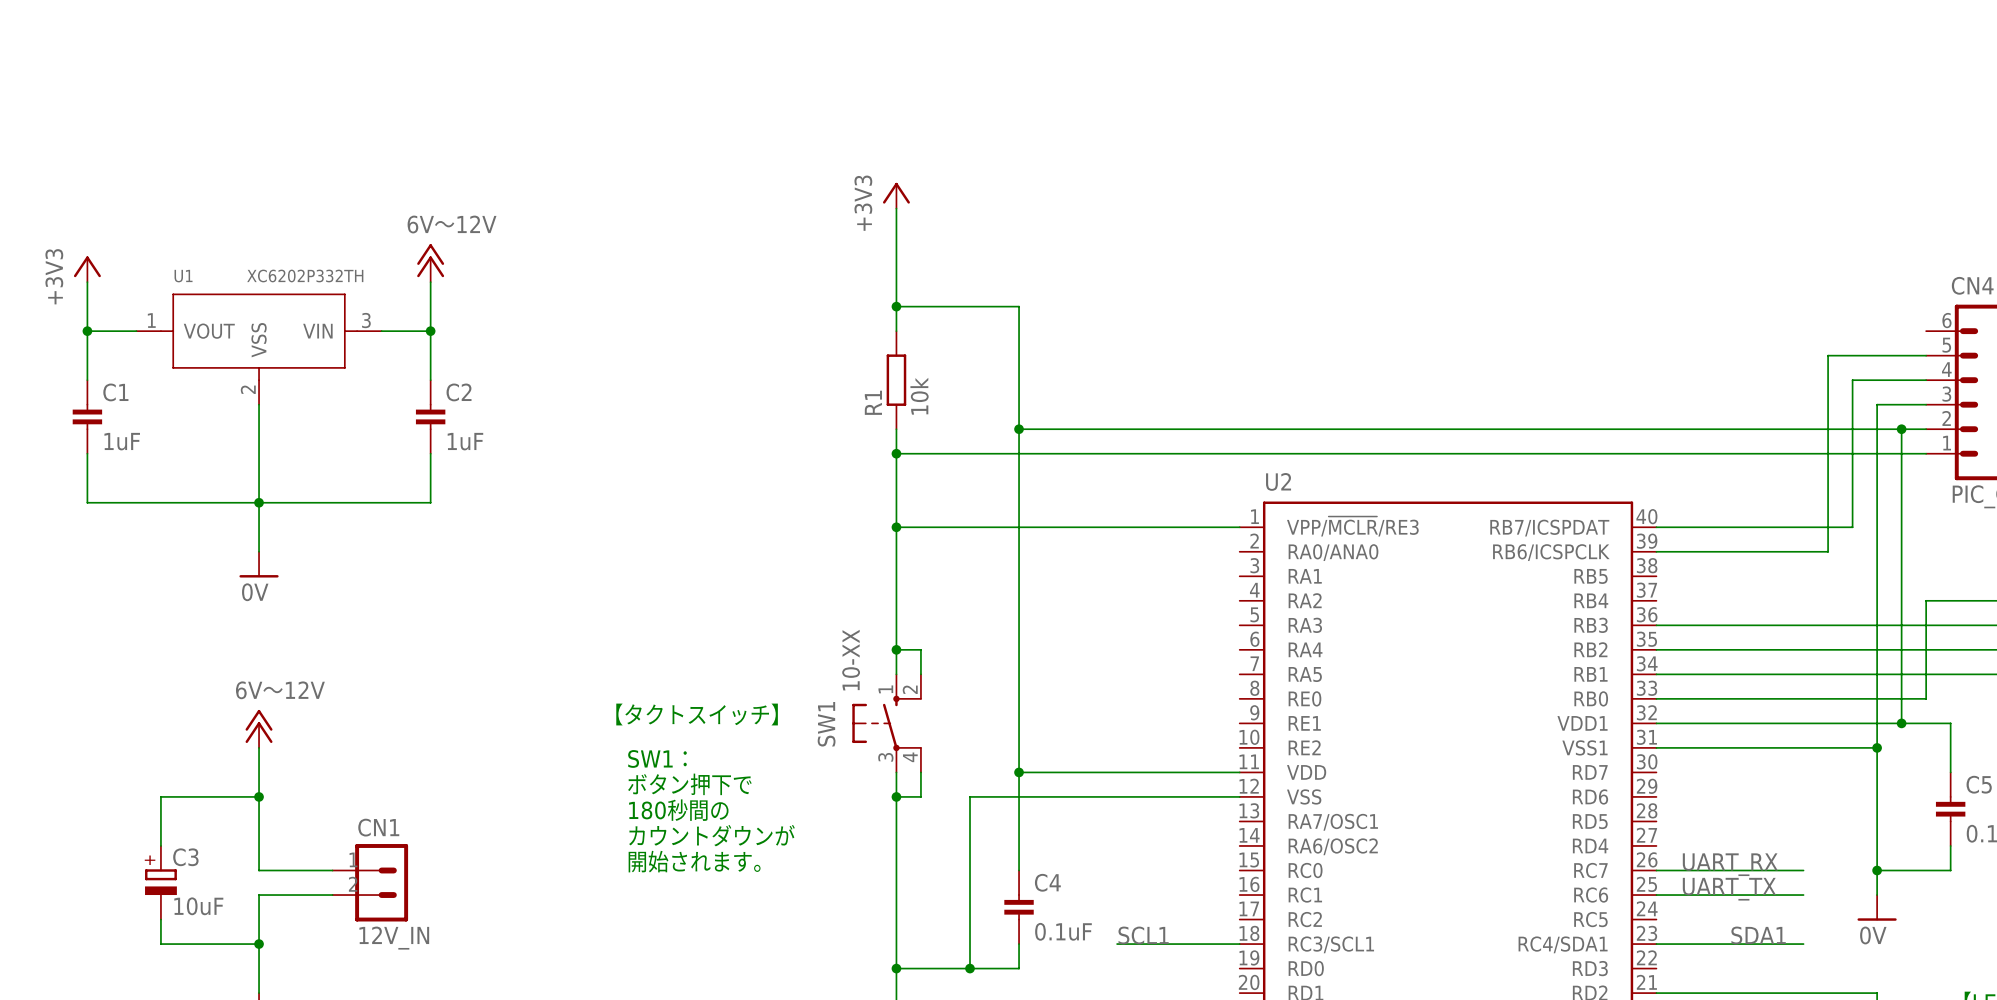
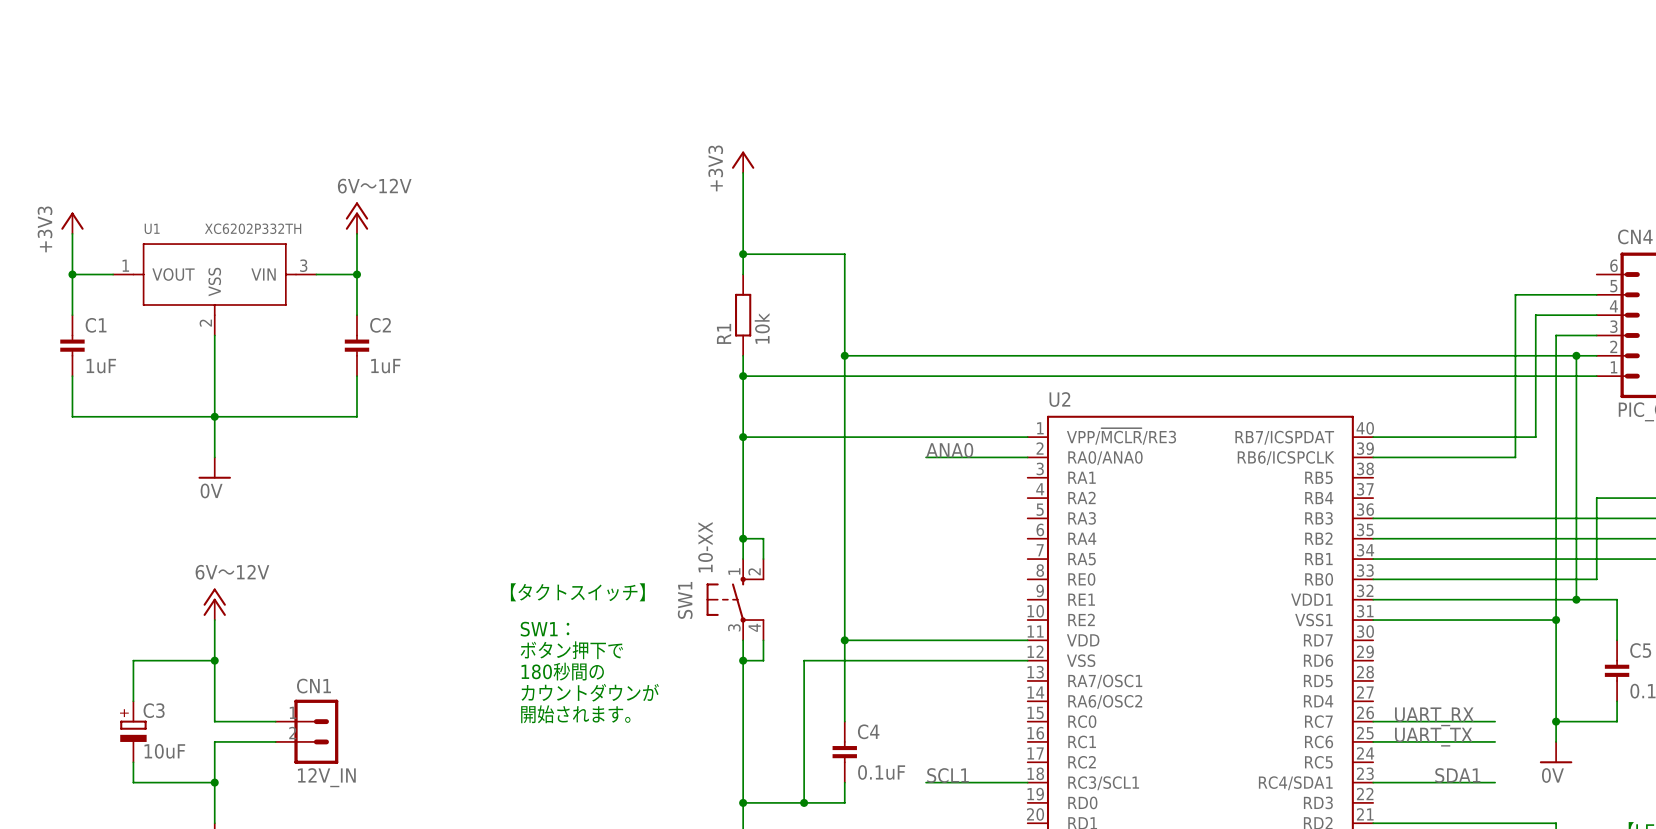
label: none -> ANA0 (949, 450)
wire: none -> (926, 457) (1027, 457)

